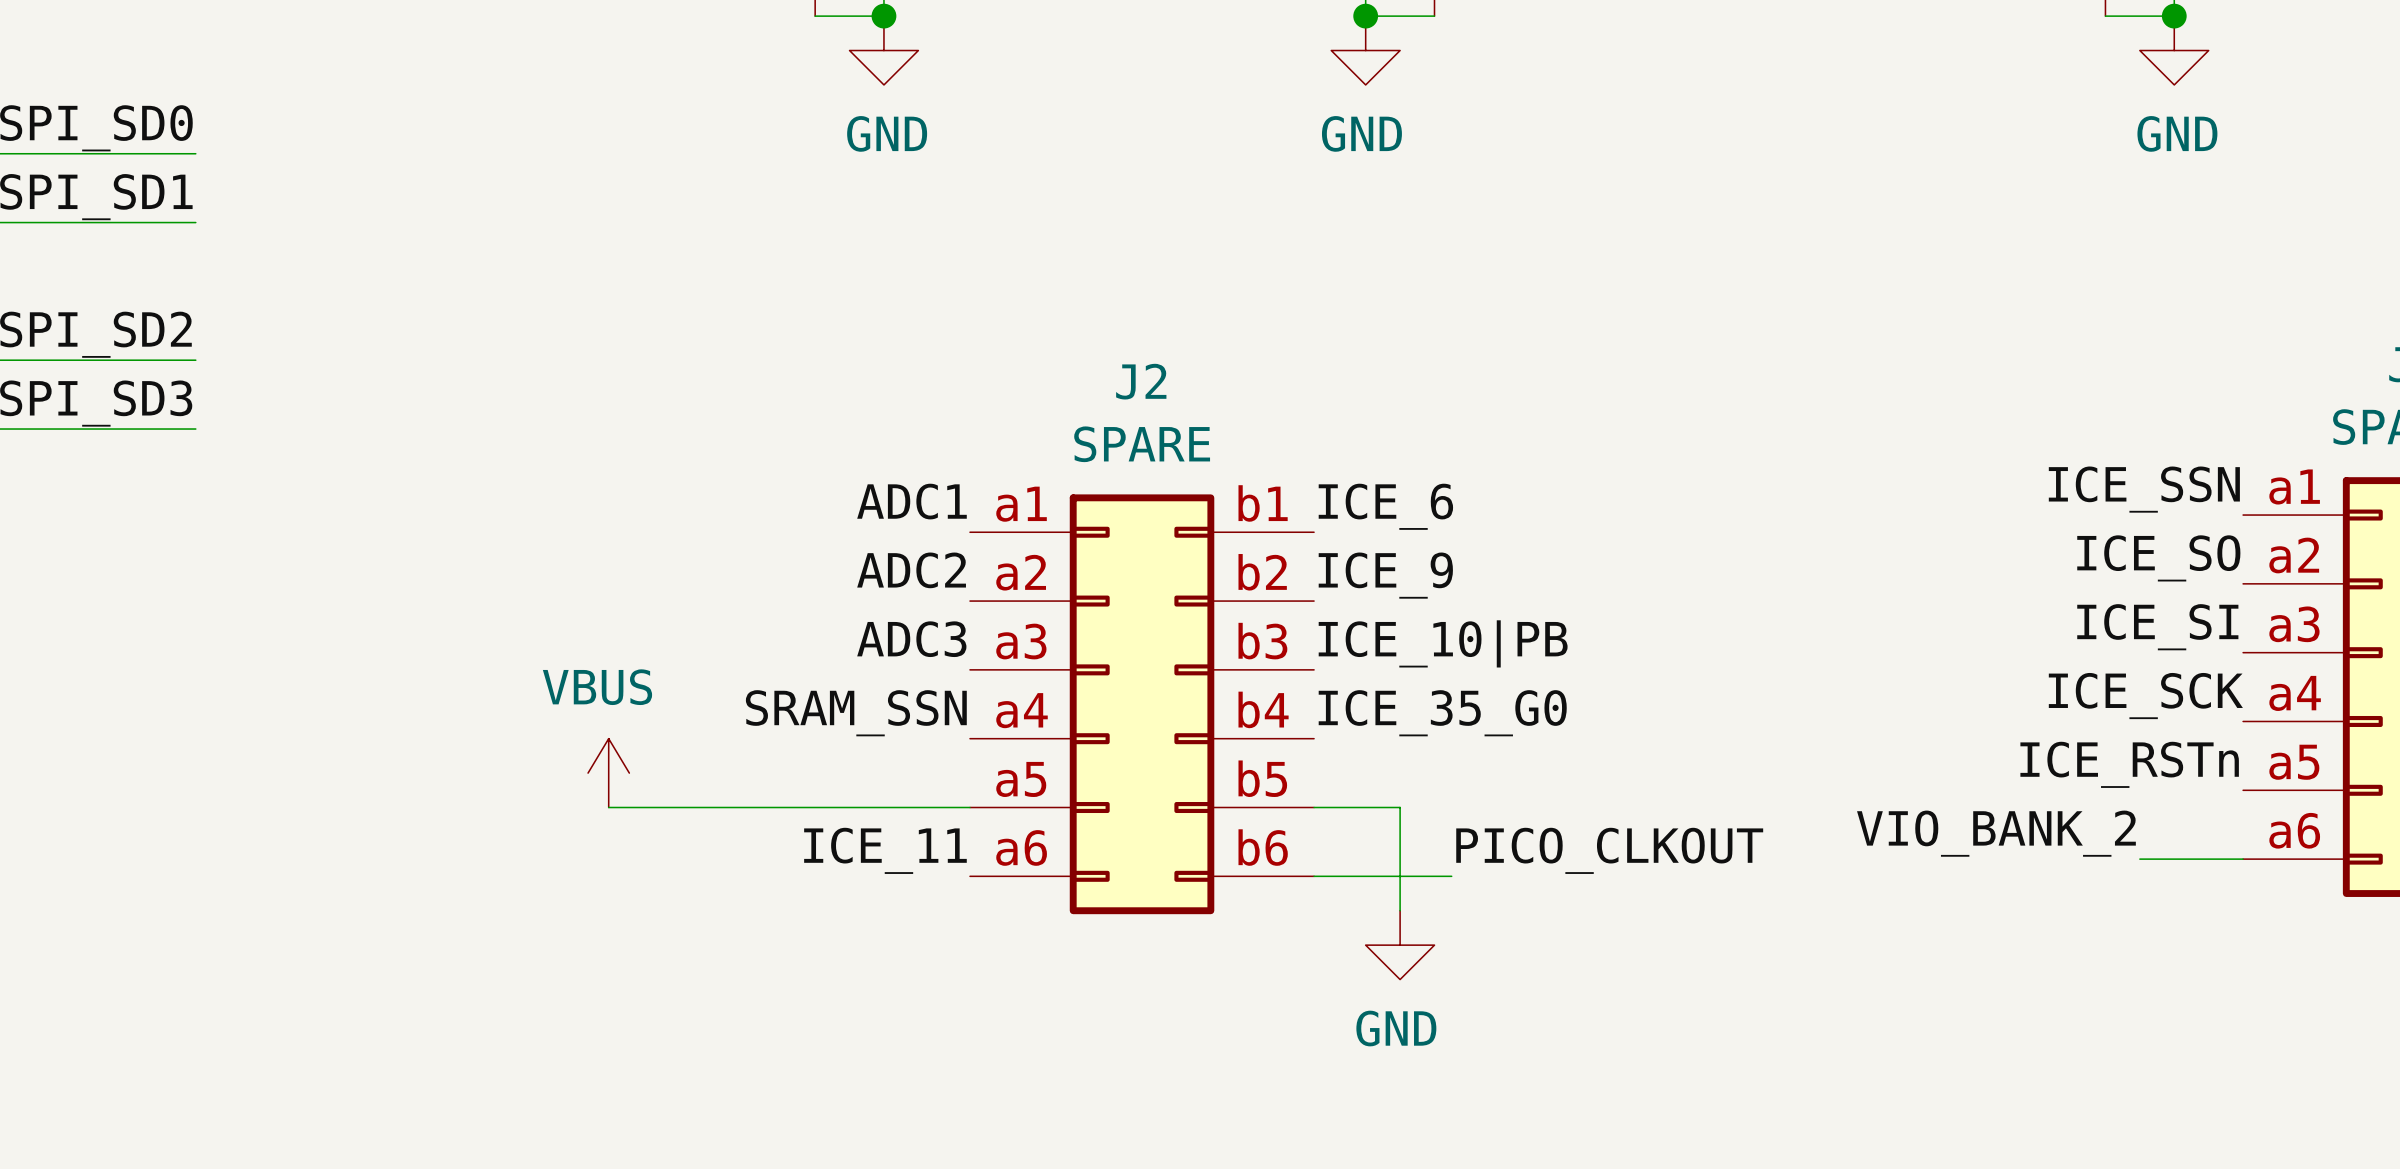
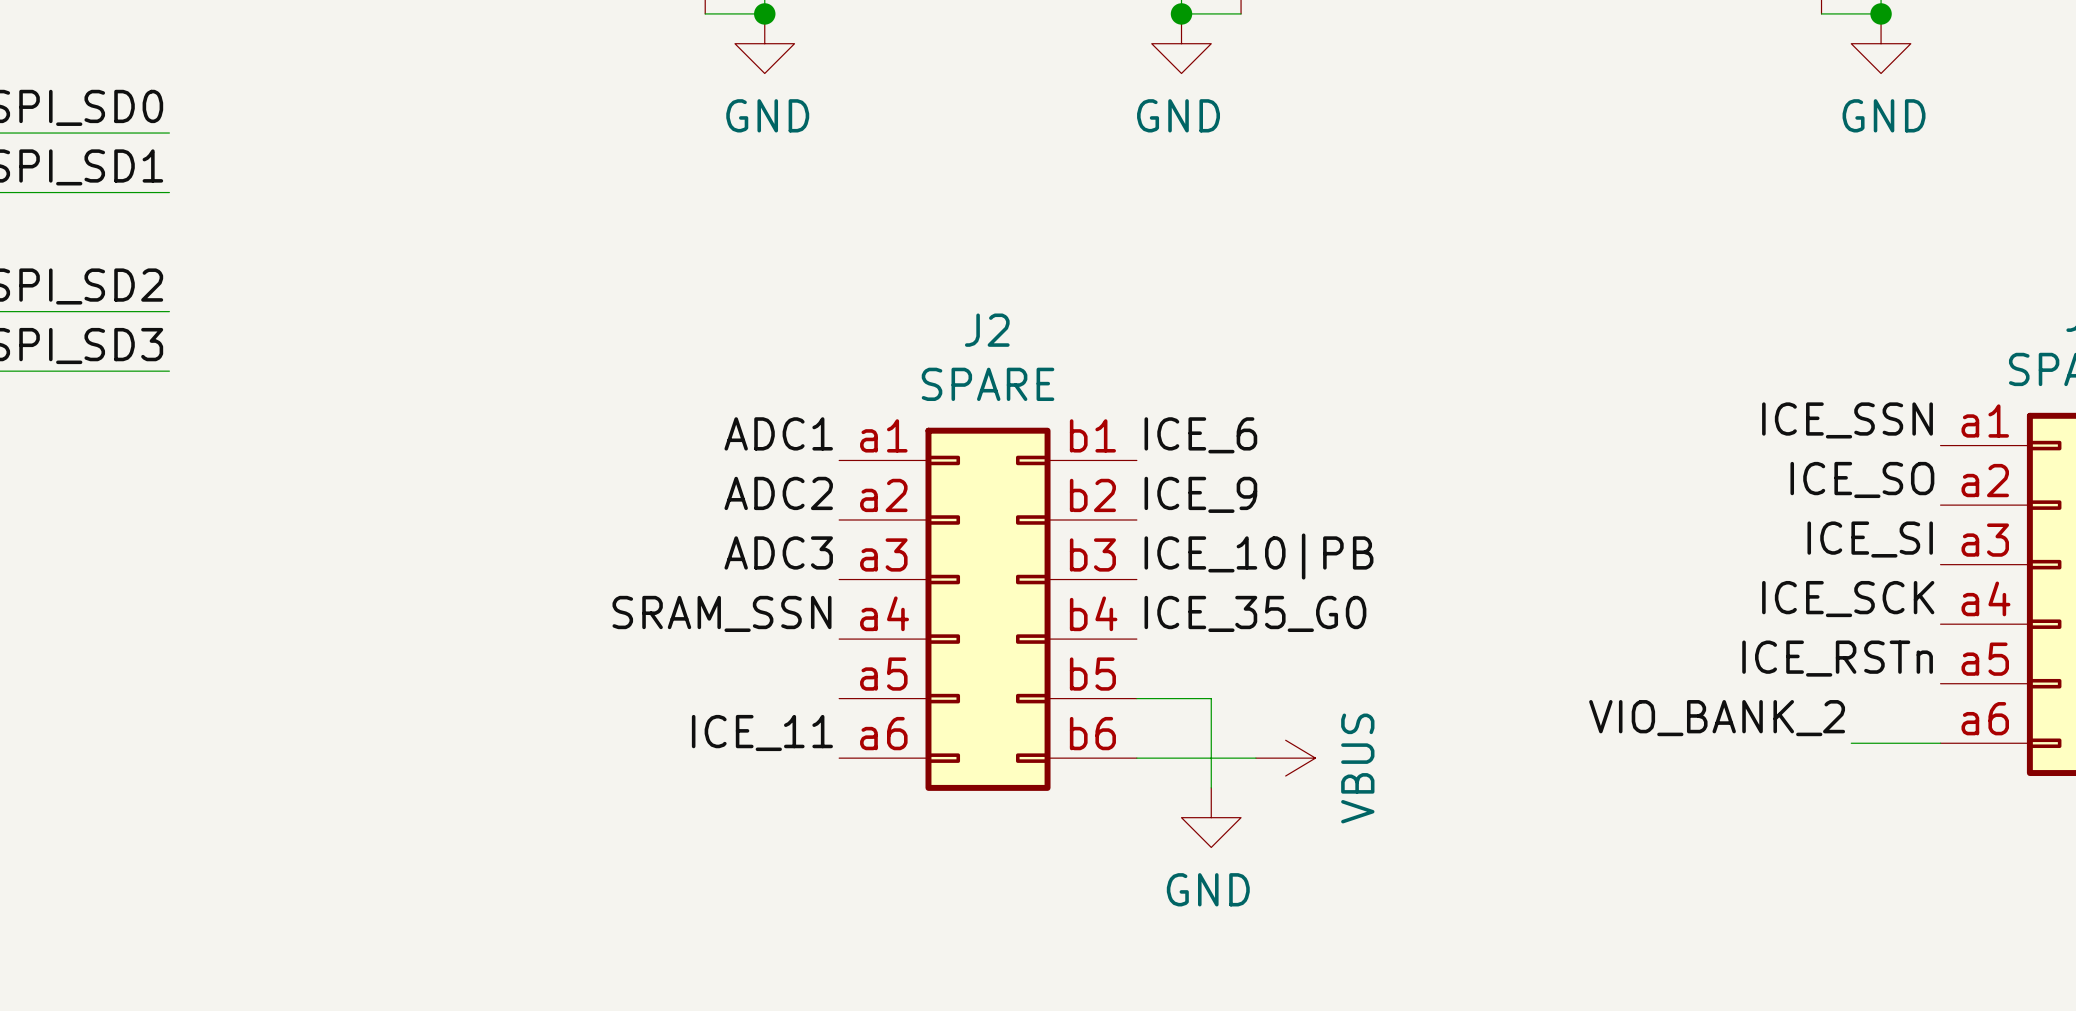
power symbol: VBUS (608, 773) -> none
wire: (608, 807) (969, 807) -> none
label: PICO_CLKOUT (1609, 850) -> none
power symbol: none -> VBUS (1285, 758)

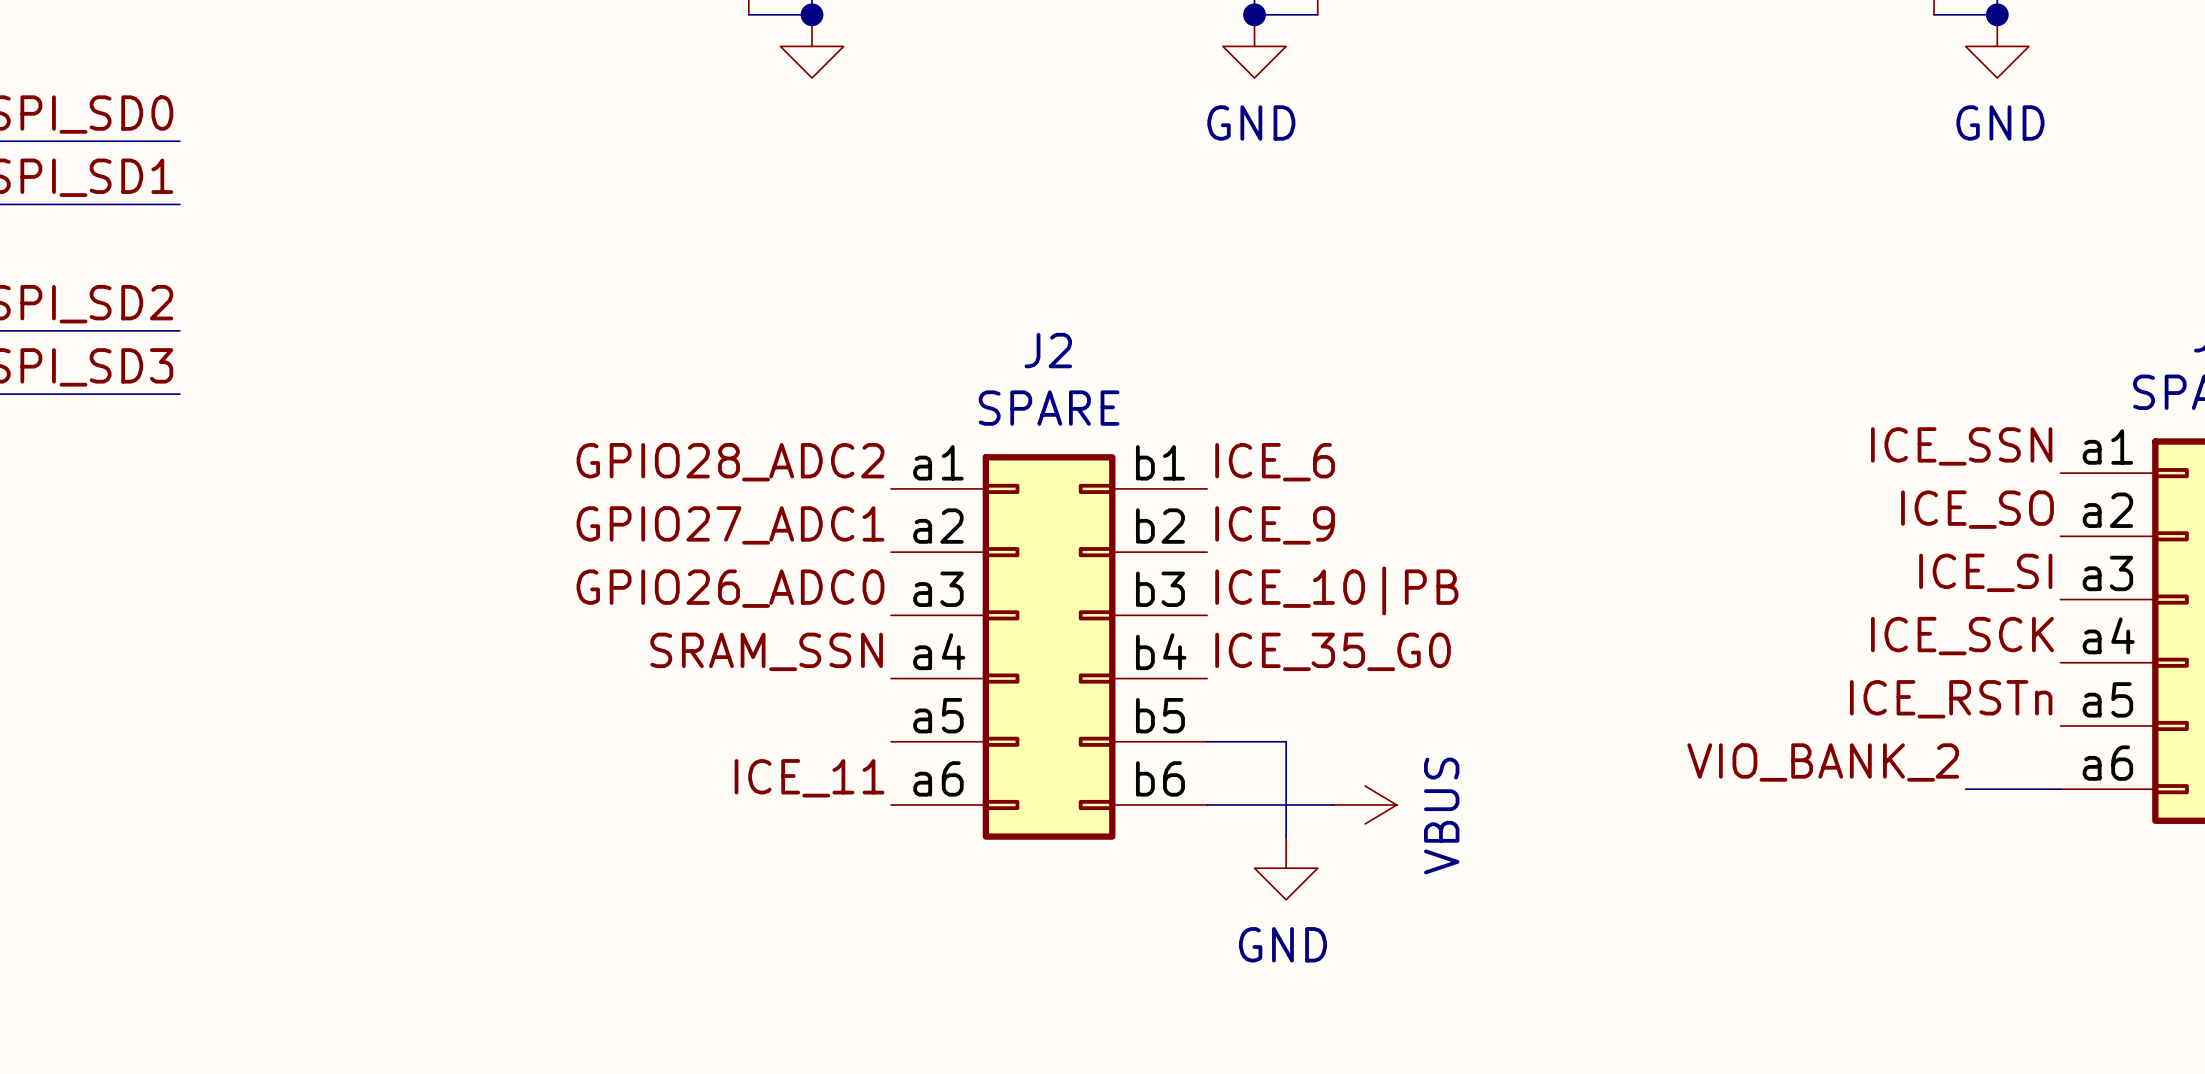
power symbol text: GND (767, 115) -> none
label: ADC1 (778, 433) -> GPIO28_ADC2 (730, 462)
label: ADC2 (778, 493) -> GPIO27_ADC1 (730, 525)
label: ADC3 (778, 552) -> GPIO26_ADC0 (730, 588)

